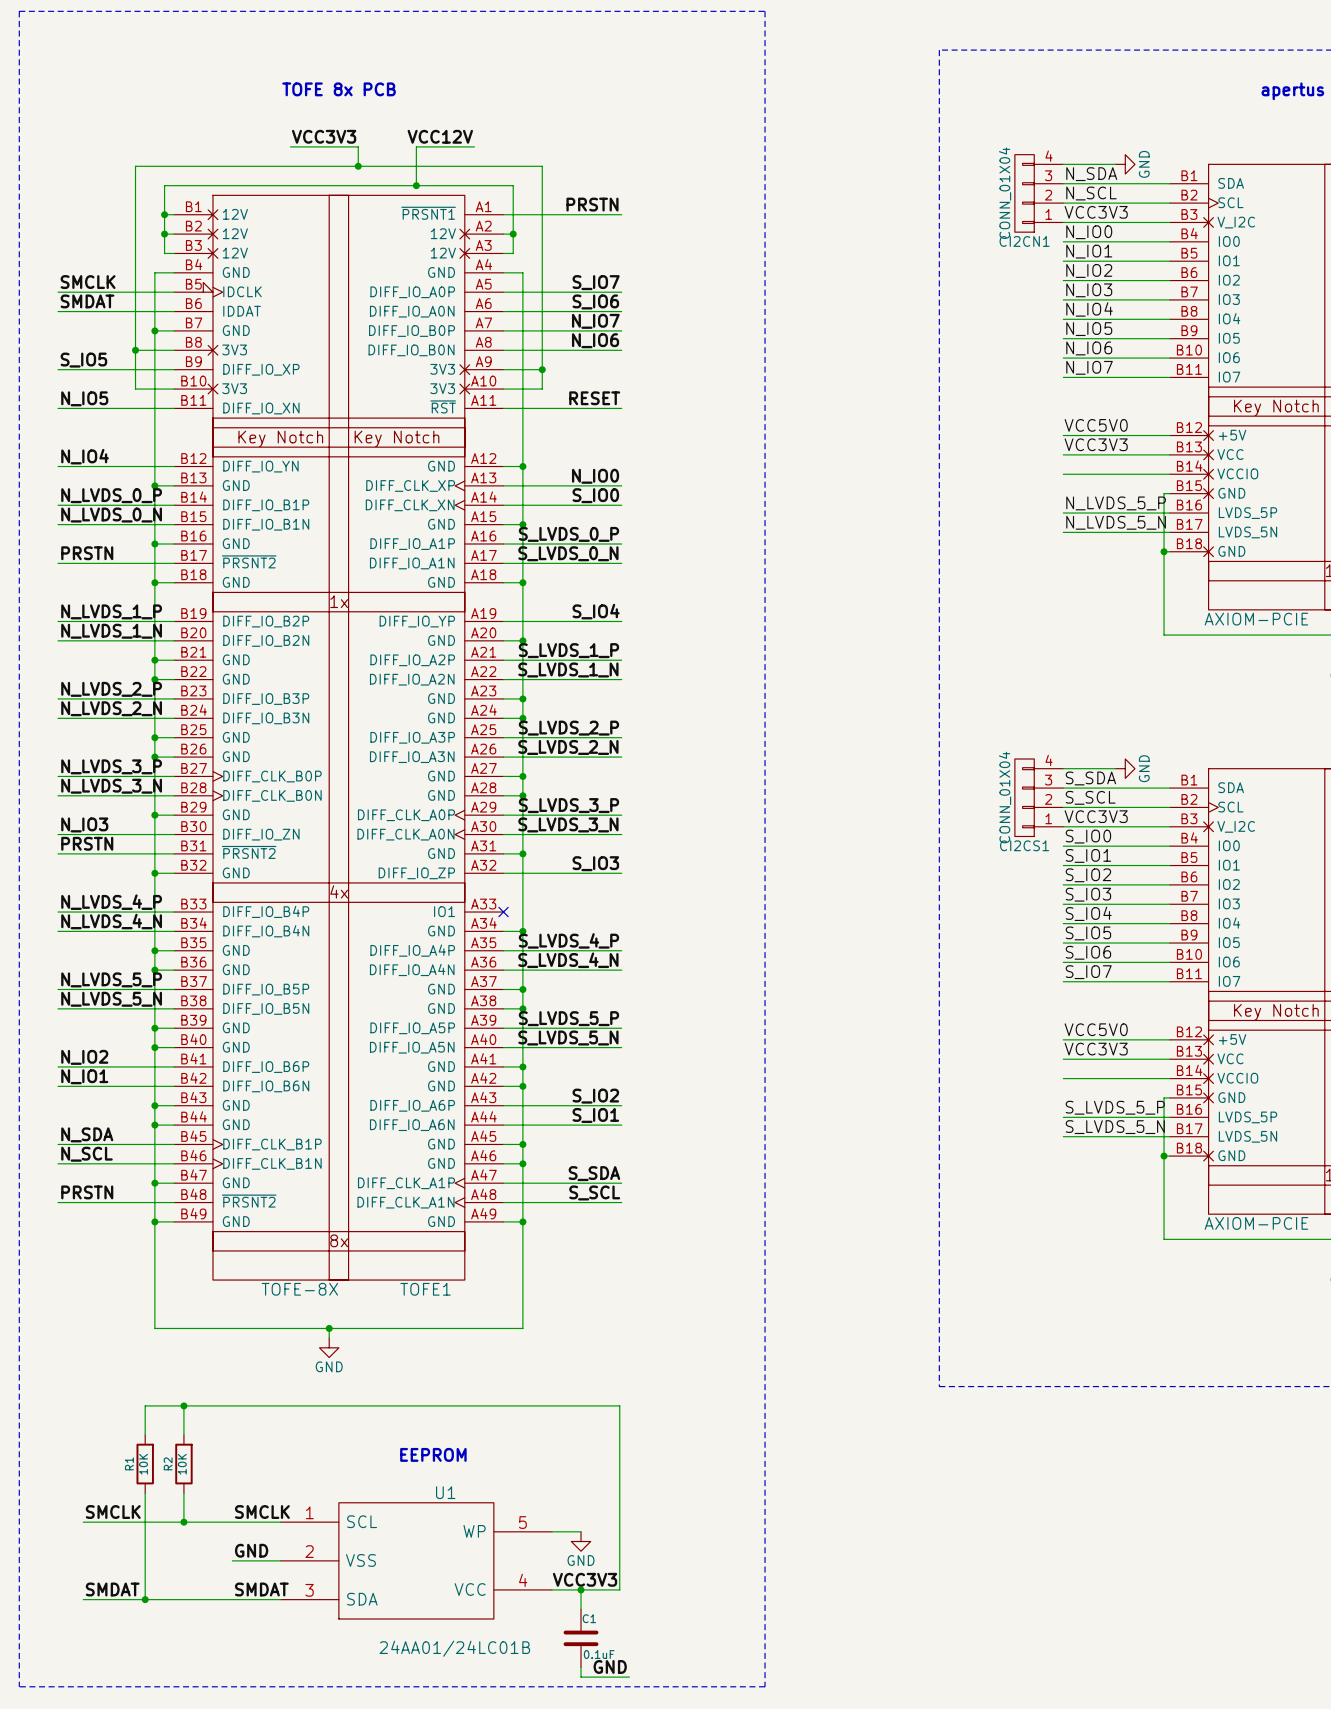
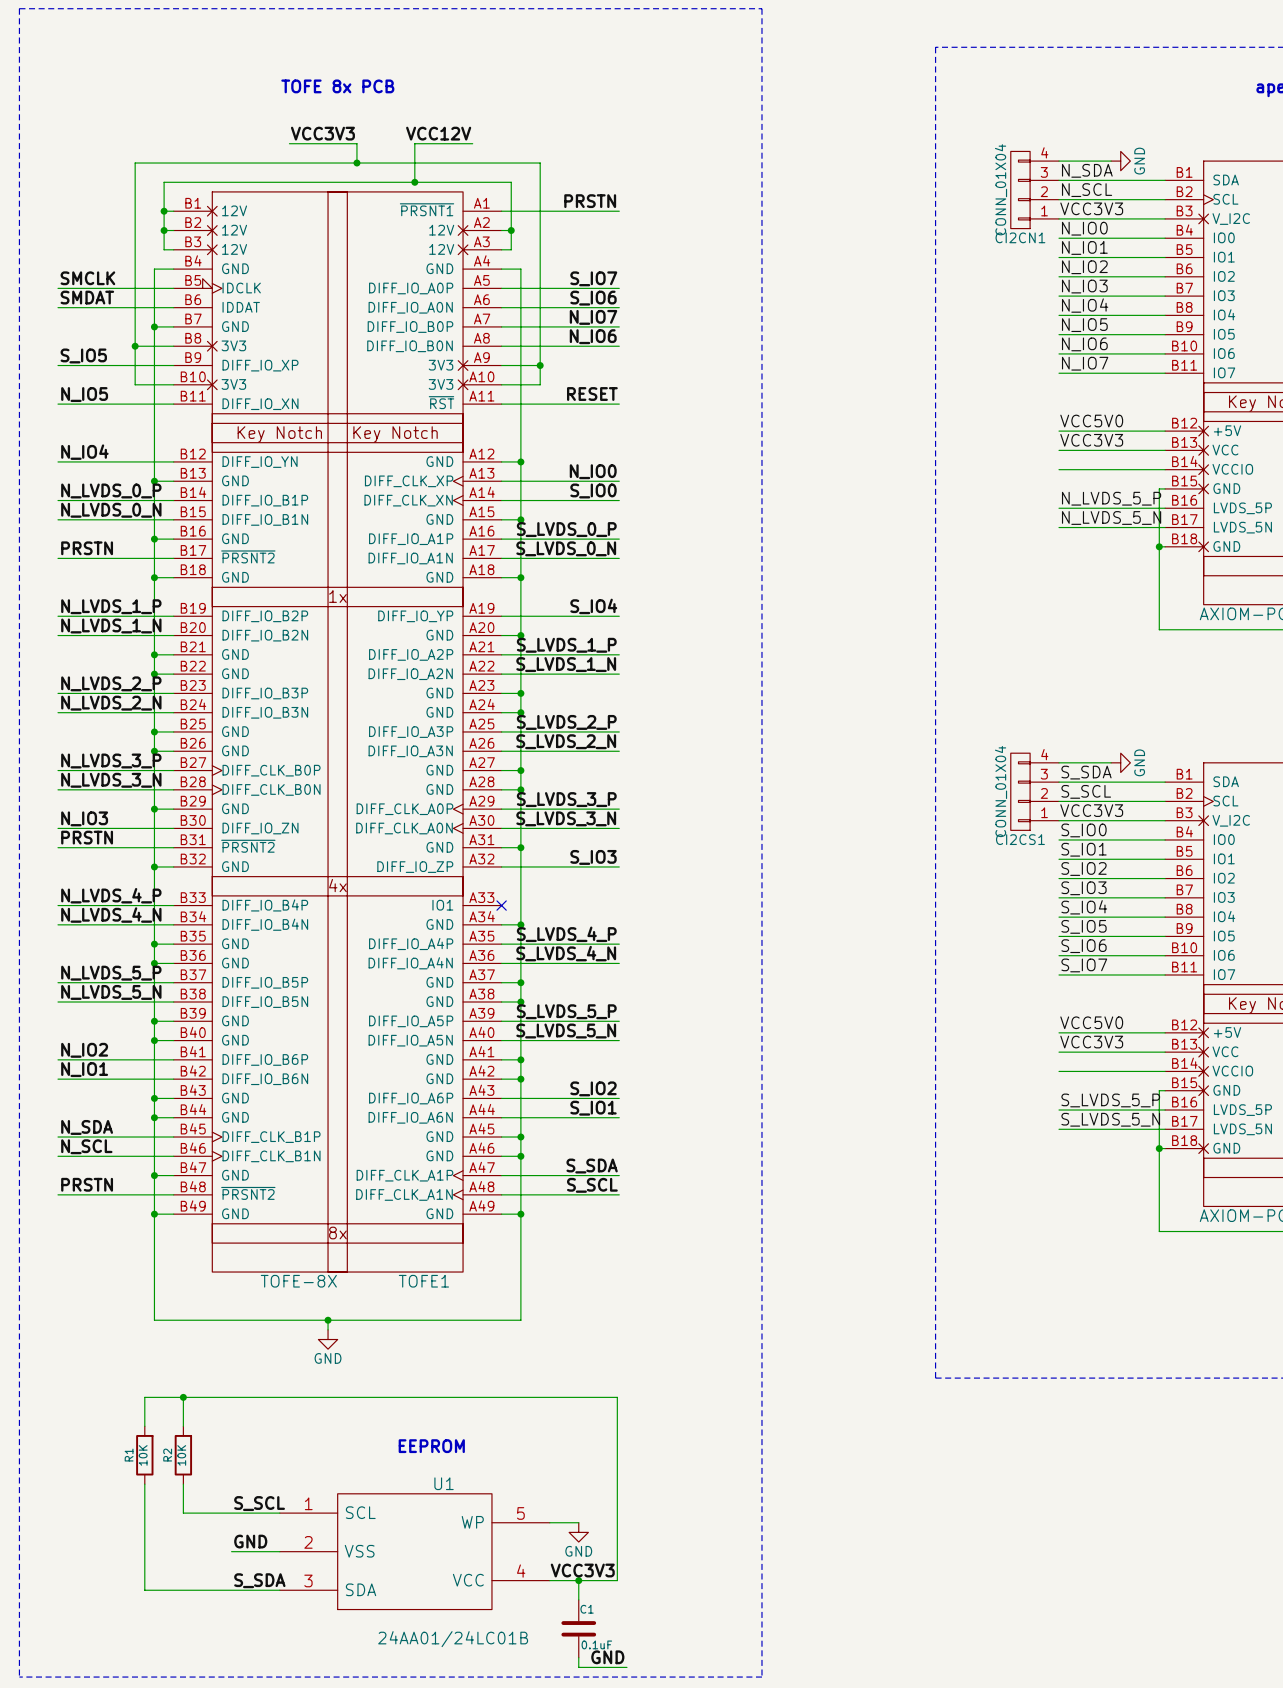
label: SMCLK (113, 1512) -> none
label: SMCLK (262, 1512) -> S_SCL (259, 1503)
wire: (83, 1522) (183, 1522) -> none
junction: (183, 1522) -> none
label: SMDAT (112, 1589) -> none
label: SMDAT (261, 1589) -> S_SDA (259, 1580)
wire: (83, 1599) (145, 1599) -> none
junction: (145, 1599) -> none

